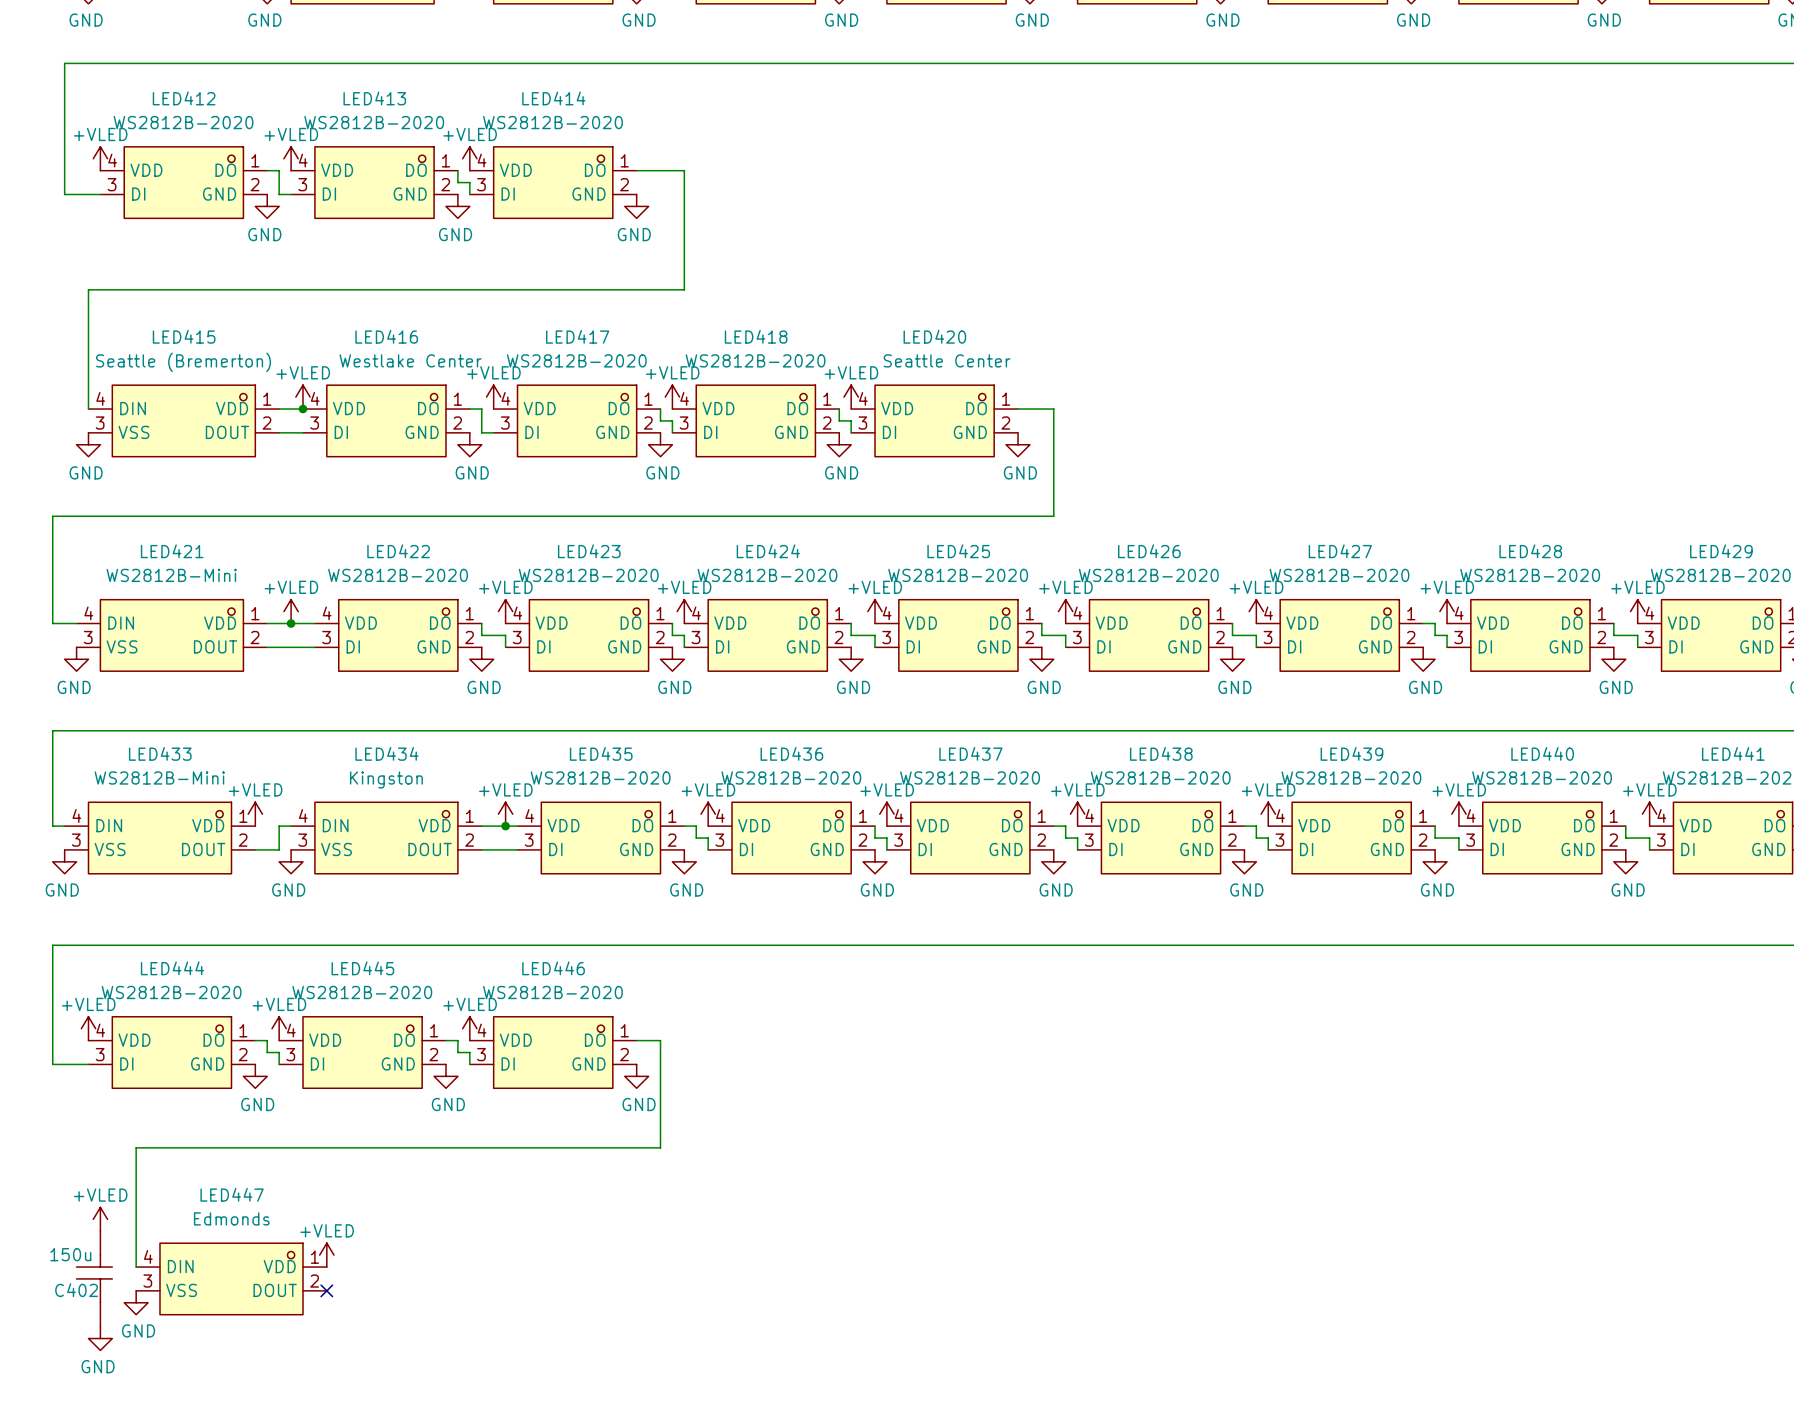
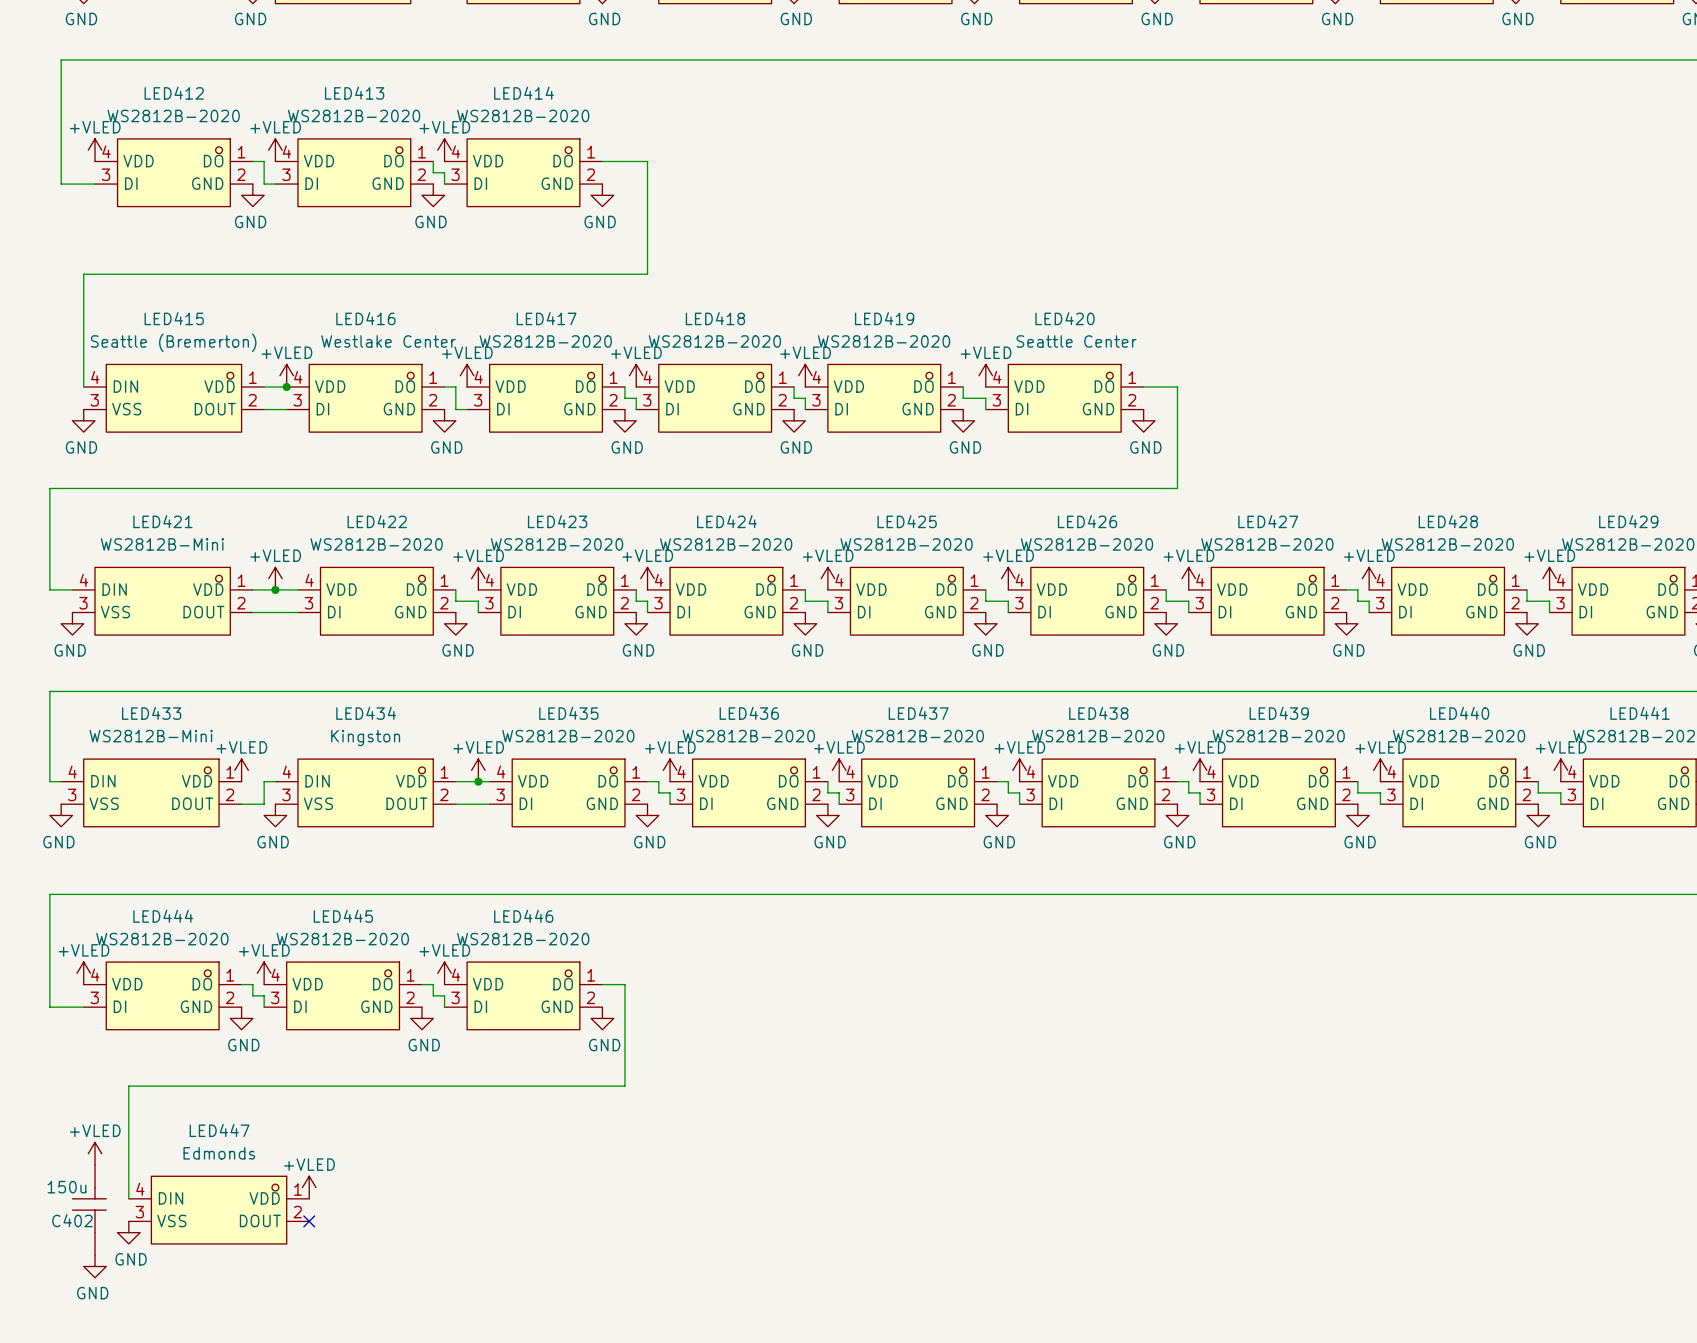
LED420 name: LED420 (934, 336) -> LED419 (884, 318)
LED420 value: none -> WS2812B-2020 (884, 341)
LED420 text: Seattle Center (947, 360) -> none
power symbol: none -> +VLED (985, 375)
wire: (1018, 409) (1053, 409) (1053, 516) -> (963, 387) (963, 398) (985, 398) (985, 409)
wire: none -> (1143, 387) (1177, 387) (1177, 488) (997, 488)
LED420: none -> (1064, 398)
power symbol: none -> GND (1143, 420)

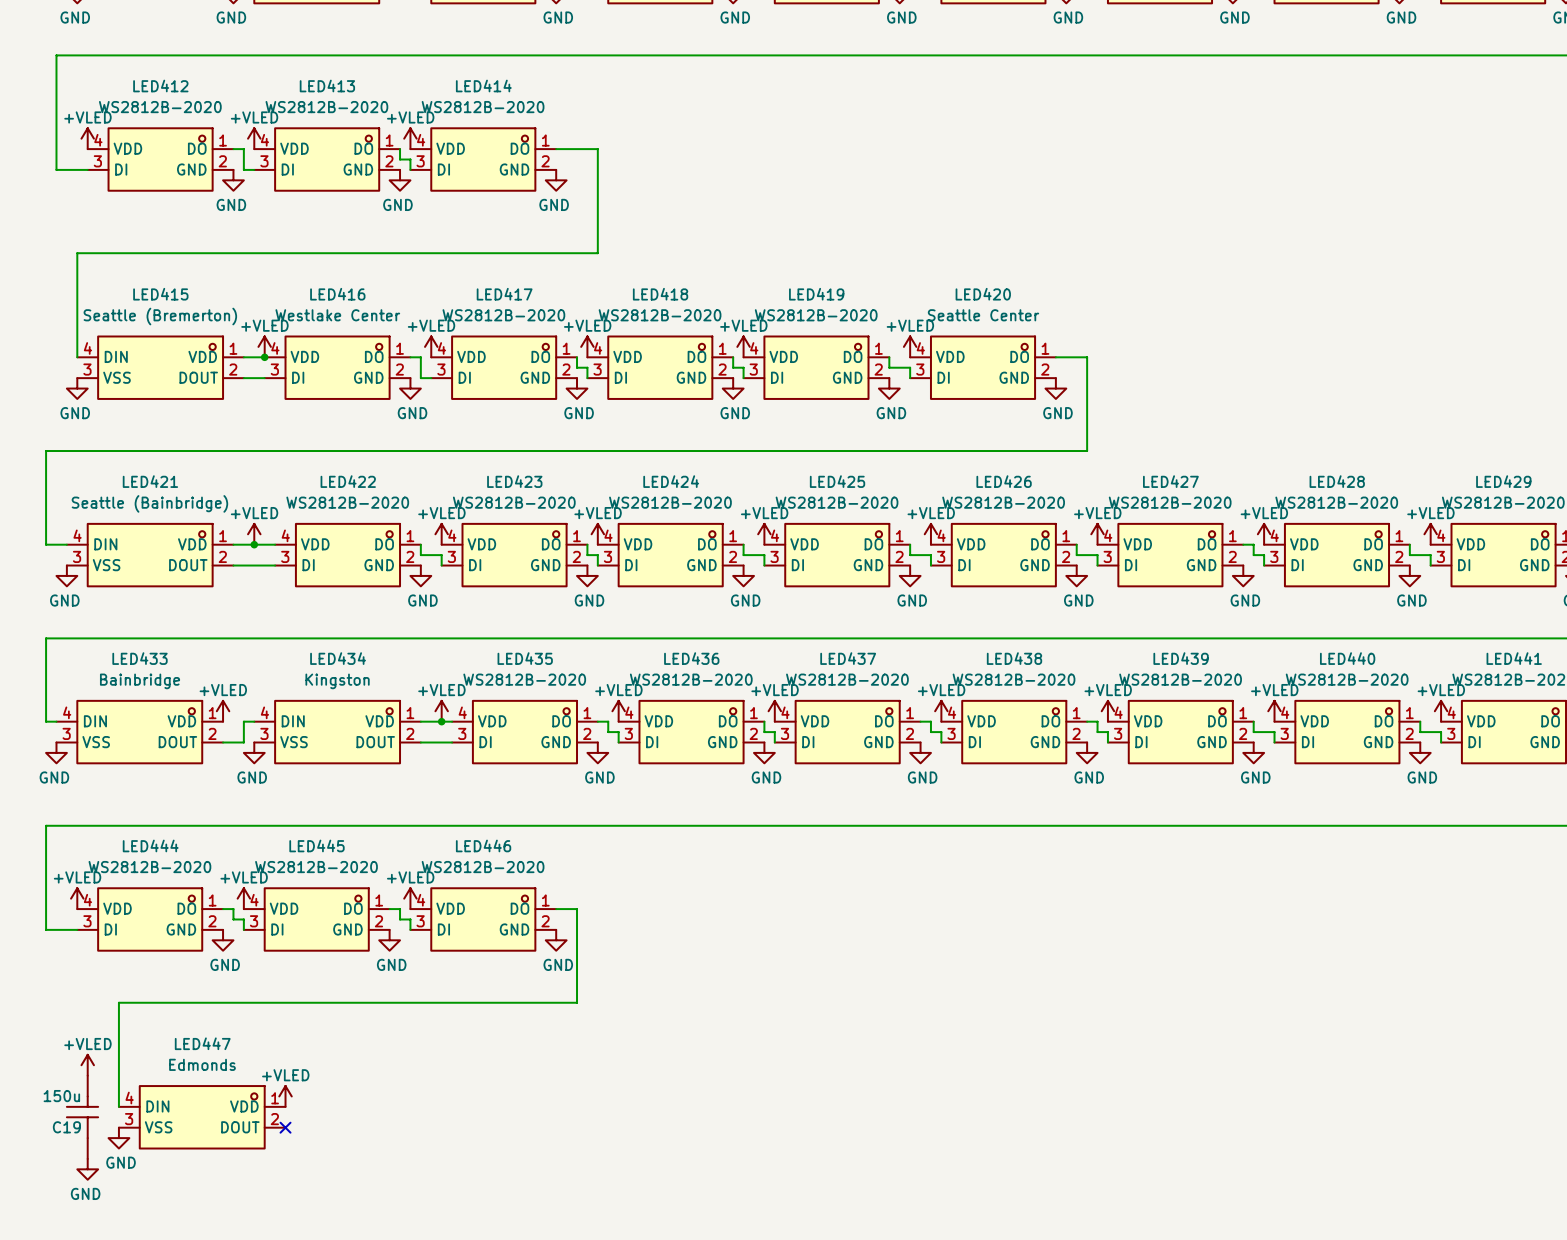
LED416 value: none -> Westlake Center (337, 315)
LED416 text: Westlake Center (388, 341) -> none
LED420 value: none -> Seattle Center (983, 315)
LED420 text: Seattle Center (1076, 341) -> none
LED421 value: WS2812B-Mini (162, 544) -> Seattle (Bainbridge) (149, 503)
LED433 value: WS2812B-Mini (151, 736) -> Bainbridge (140, 681)
C402 name: C402 (72, 1220) -> C19 (66, 1127)

